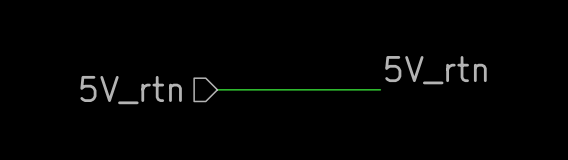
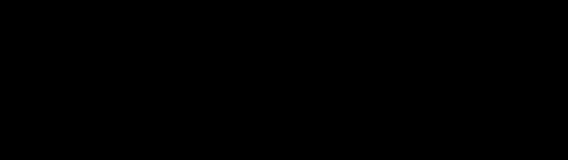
label: 5V_rtn (435, 70) -> none
wire: (217, 89) (380, 89) -> none
hierarchical label: 5V_rtn (131, 90) -> none

